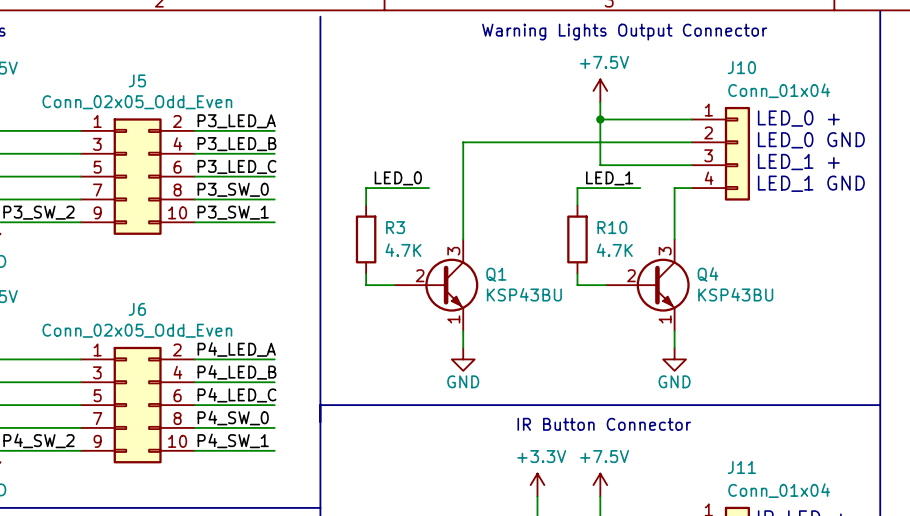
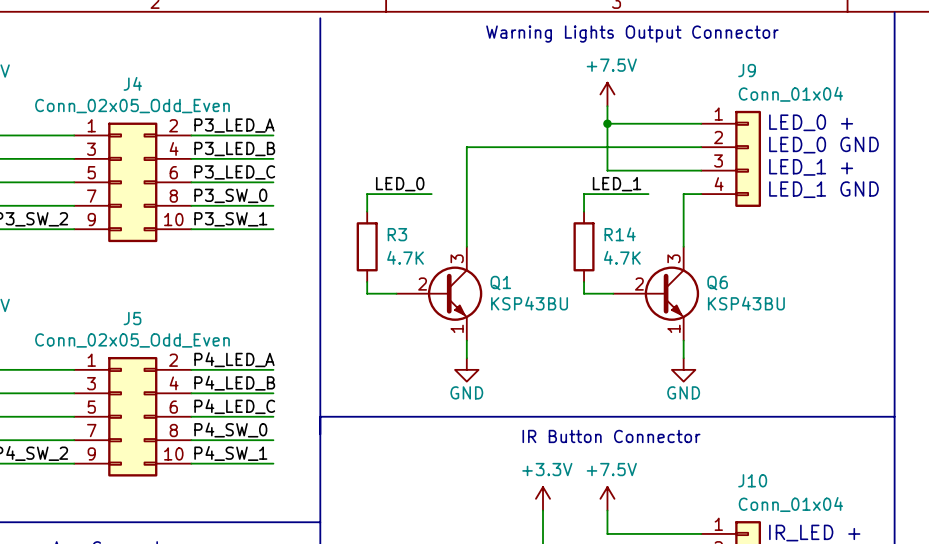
J10 name: J10 (741, 67) -> J9 (747, 70)
J5 name: J5 (137, 80) -> J4 (132, 83)
R10 name: R10 (612, 227) -> R14 (620, 234)
Q4 name: Q4 (707, 274) -> Q6 (717, 283)
J6 name: J6 (137, 309) -> J5 (132, 318)
J11 name: J11 (741, 467) -> J10 (752, 480)

